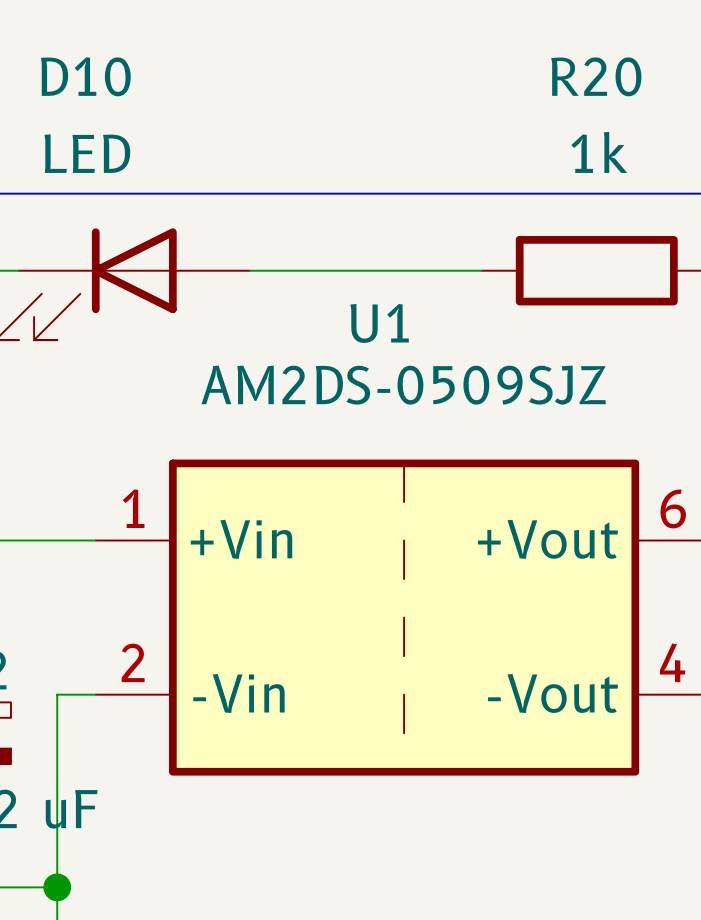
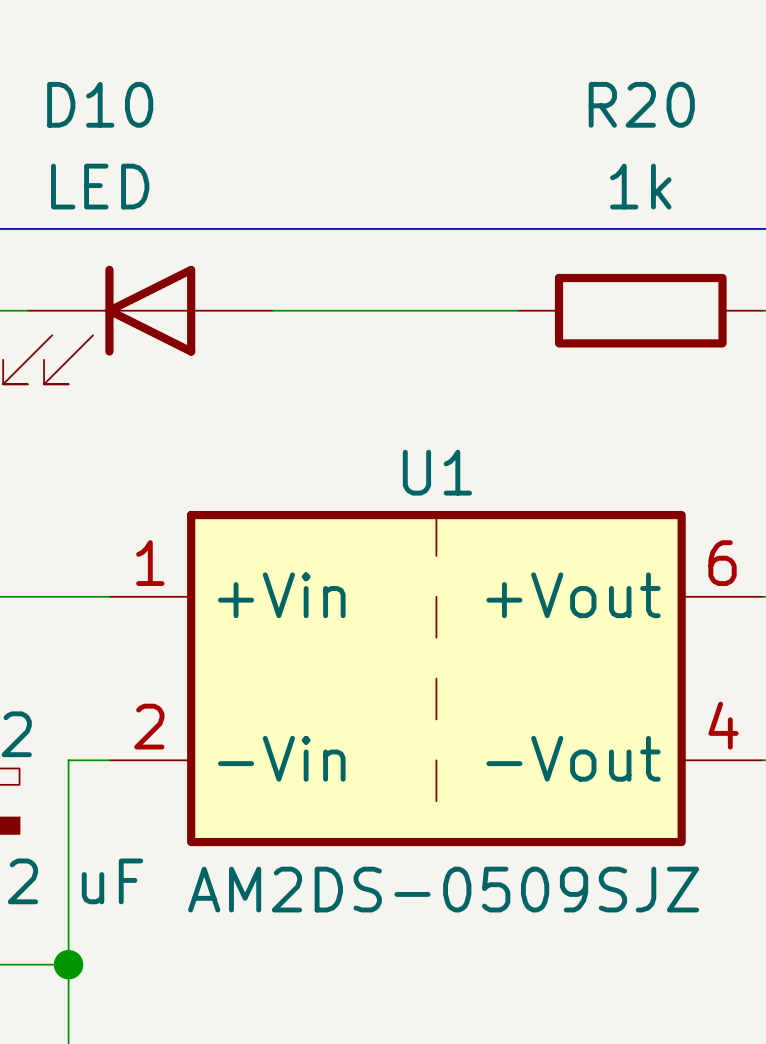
U1 name position: U1 (379, 323) -> U1 (437, 472)
U1 value position: AM2DS-0509SJZ (403, 385) -> AM2DS-0509SJZ (443, 889)

